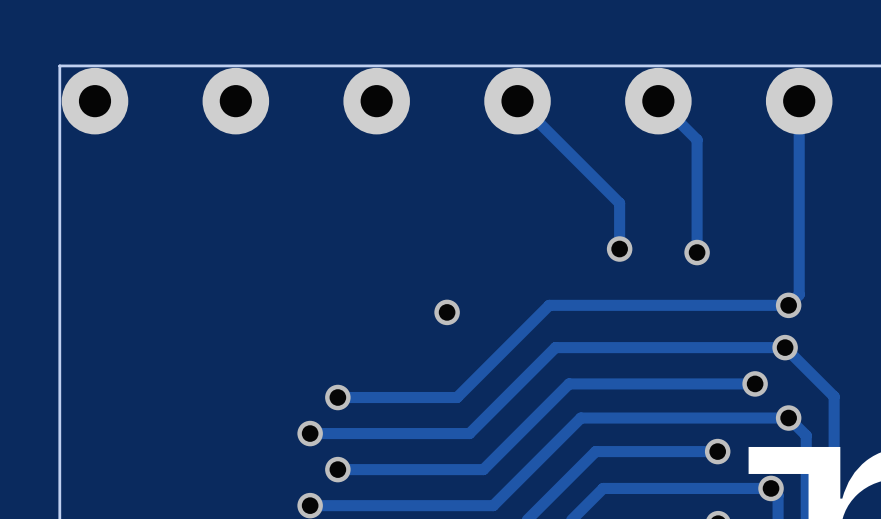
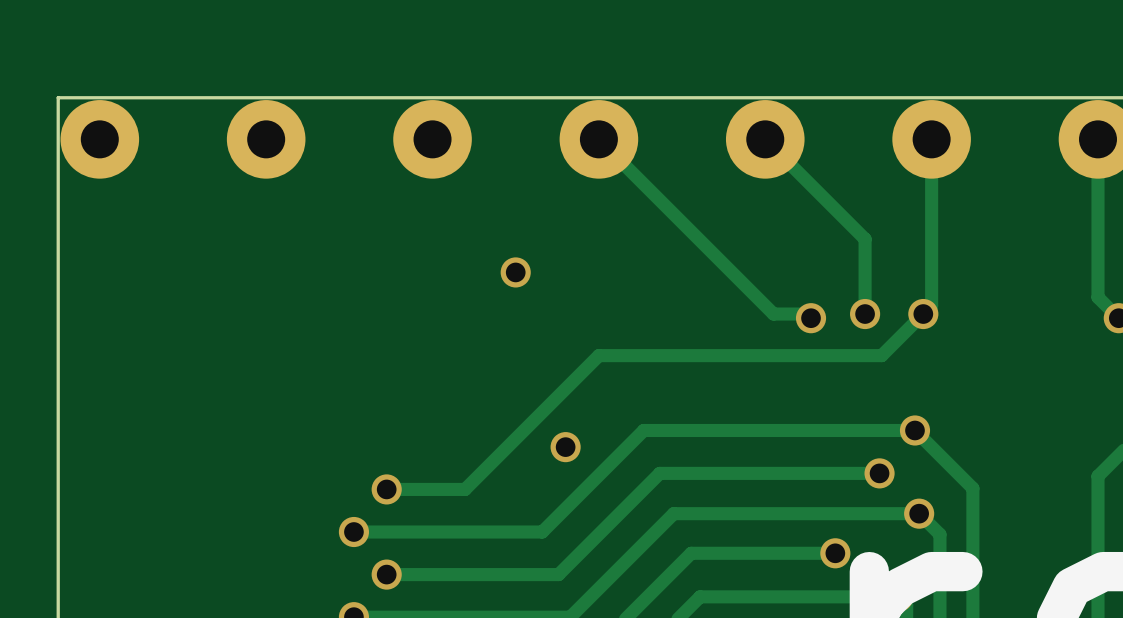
track: (697, 139) (697, 252) -> (811, 185) (865, 239) (865, 314)
track: (619, 203) (619, 249) -> (719, 259) (773, 314) (806, 314)
via: none -> (515, 272)
track: (799, 241) (799, 294) (788, 305) (549, 305) (457, 397) (404, 397) -> (931, 305) (881, 355) (598, 355) (465, 489)
via: (619, 249) -> none
via: none -> (865, 314)
via: none -> (923, 314)
via: (788, 305) -> none
via: (447, 312) -> none
via: none -> (565, 447)

